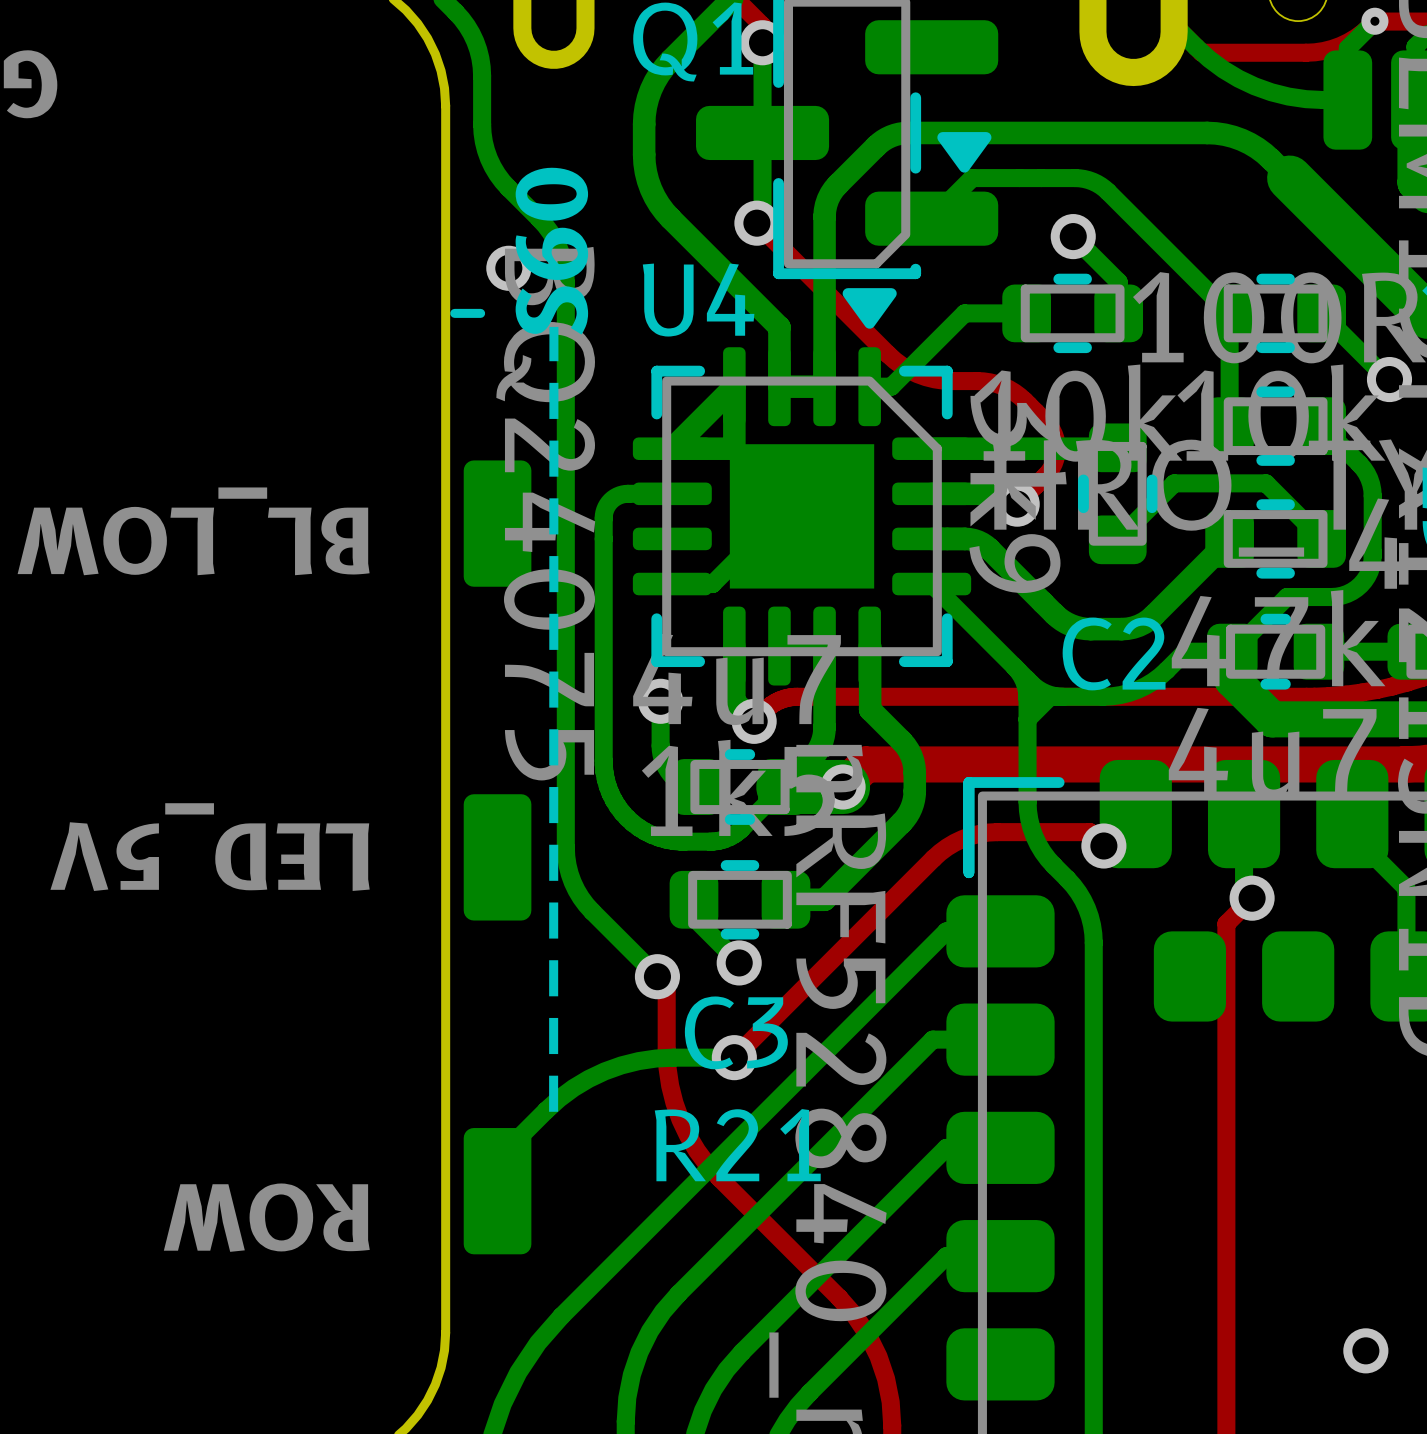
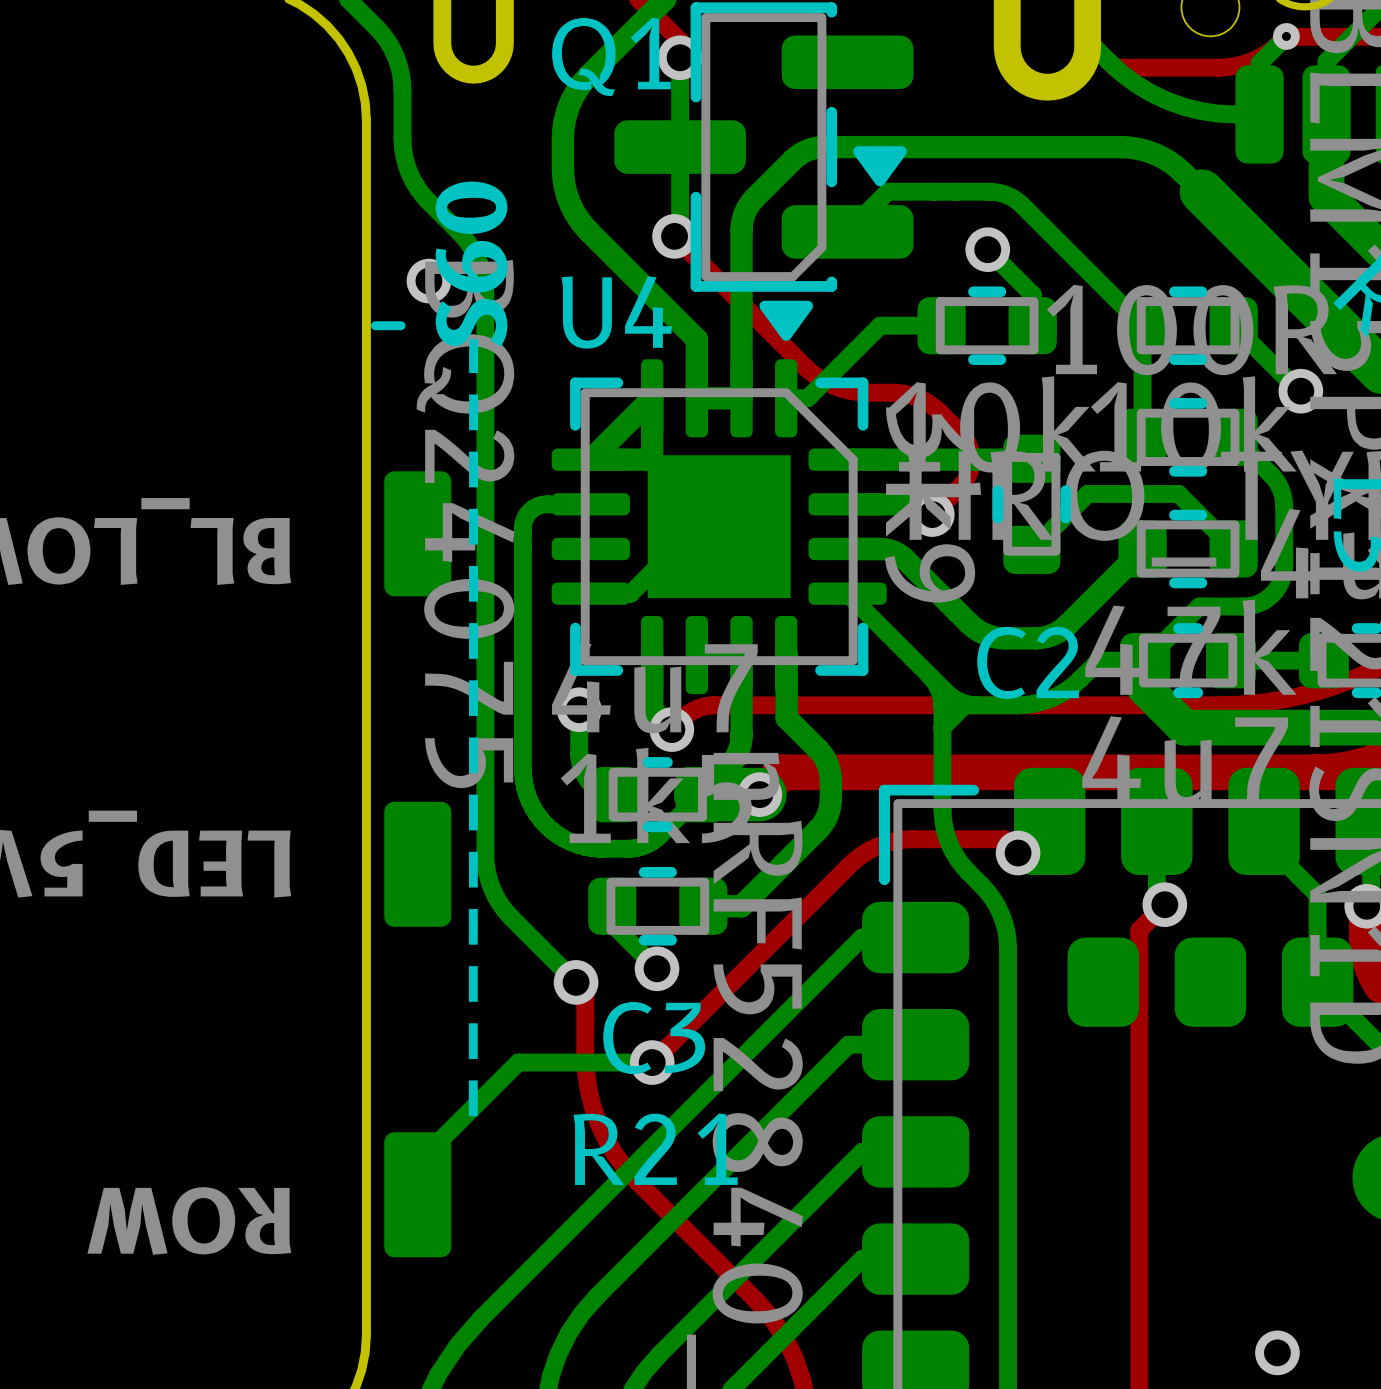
bottom track: (673, 1057) (638, 1061) (604, 1071) (573, 1088) (546, 1110) -> (592, 1062) (518, 1062) (465, 1114)

